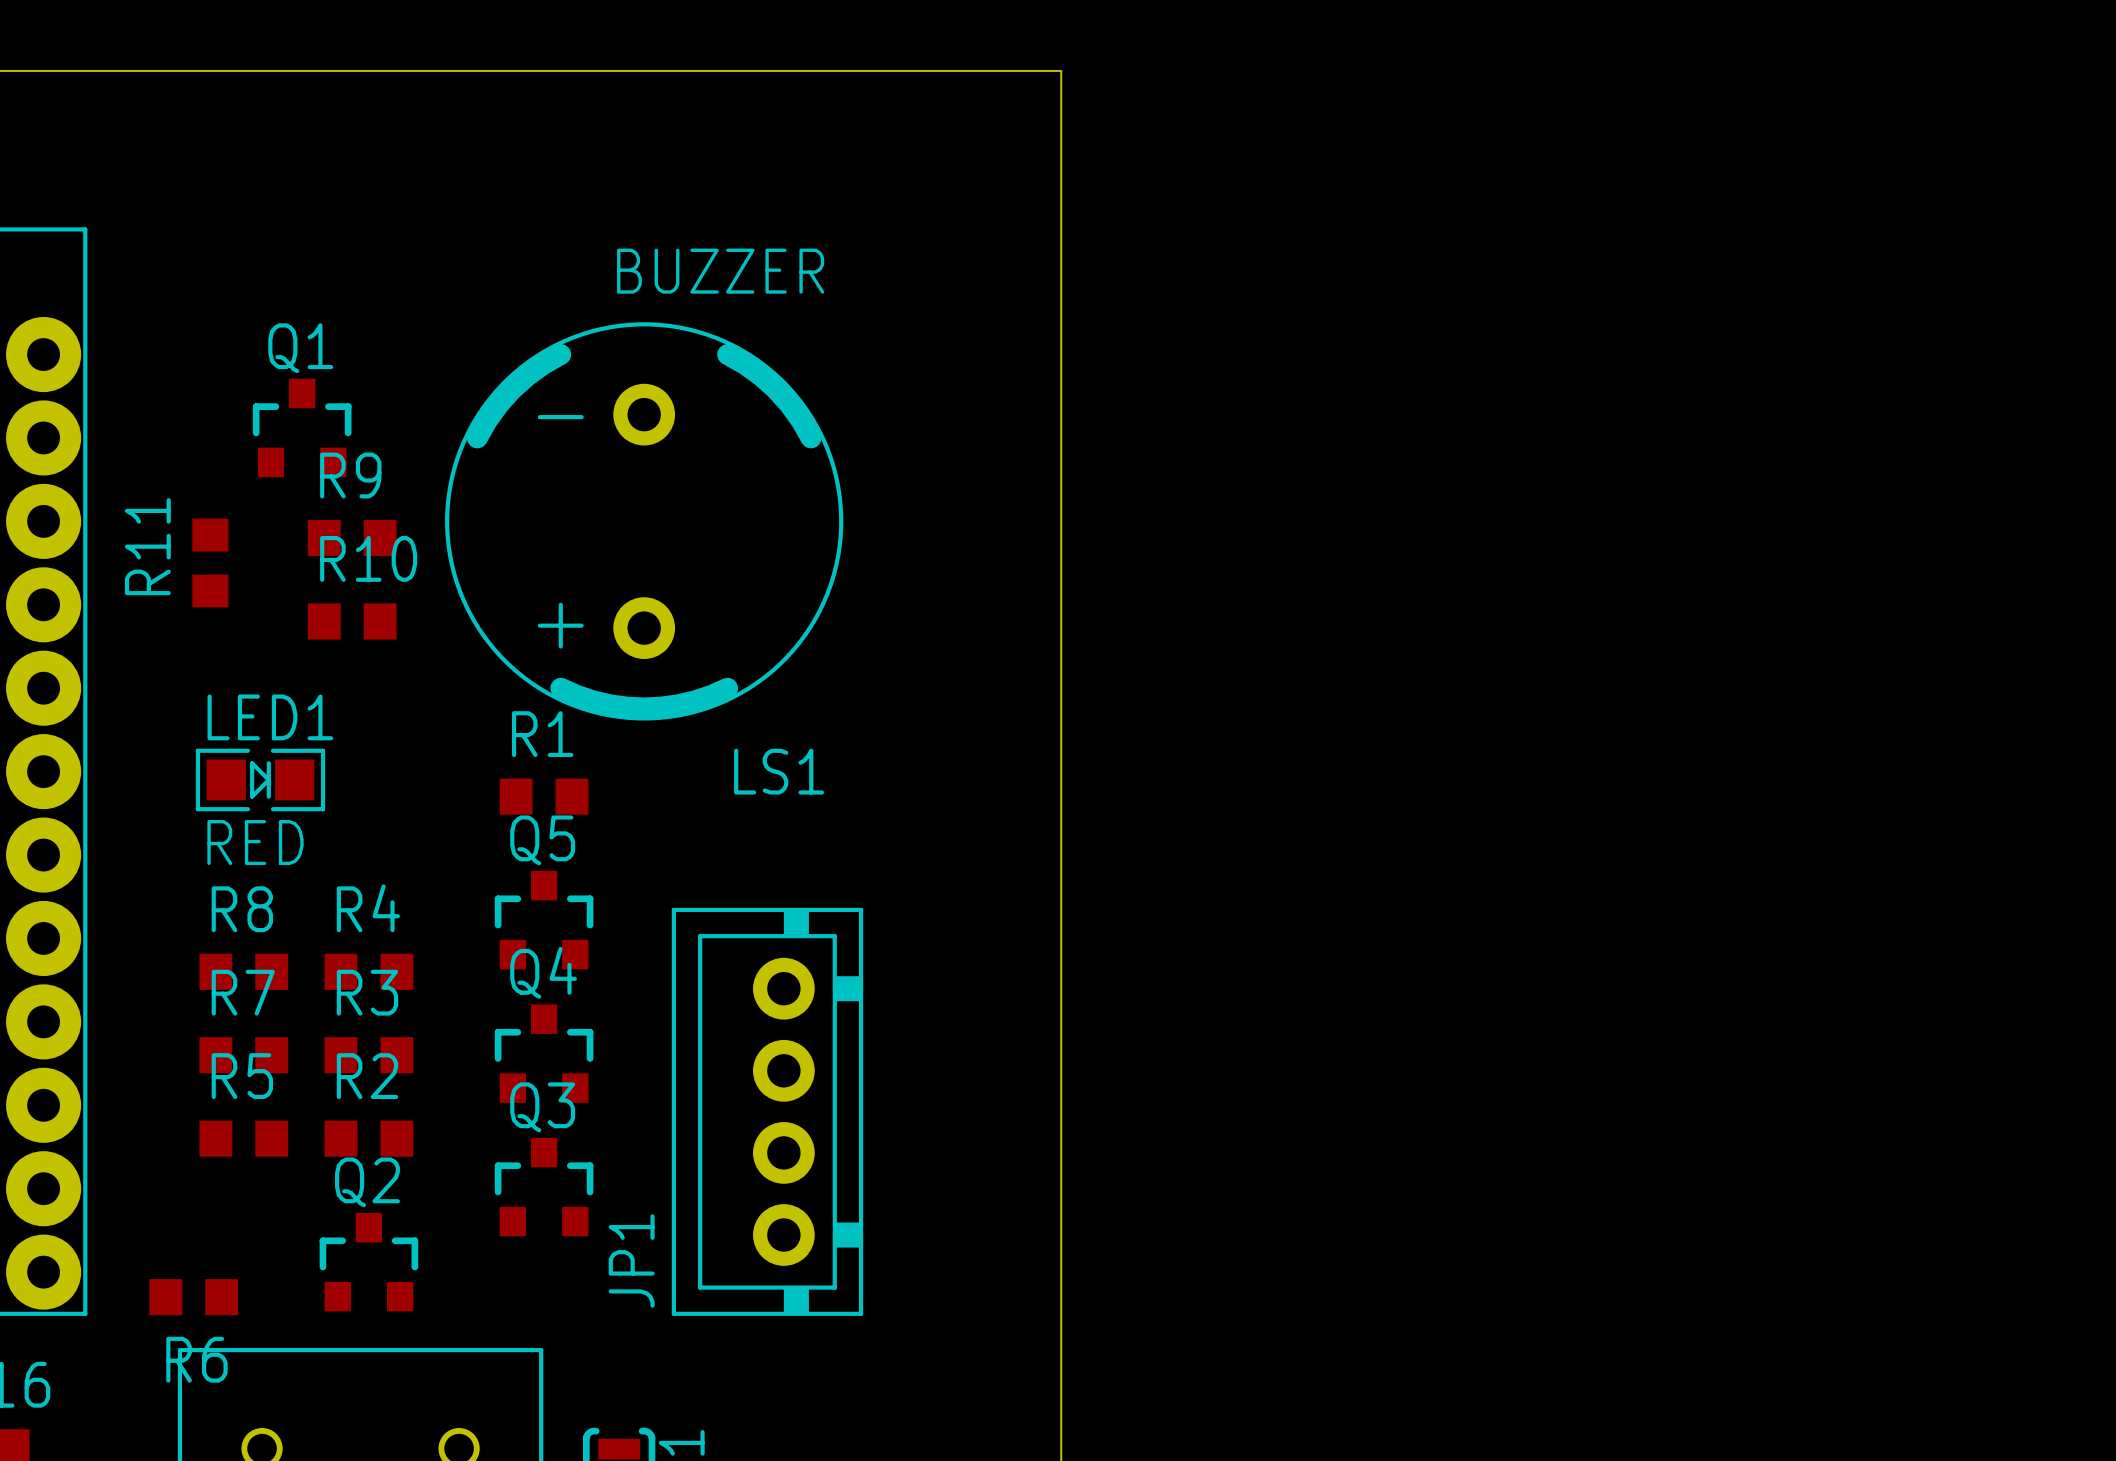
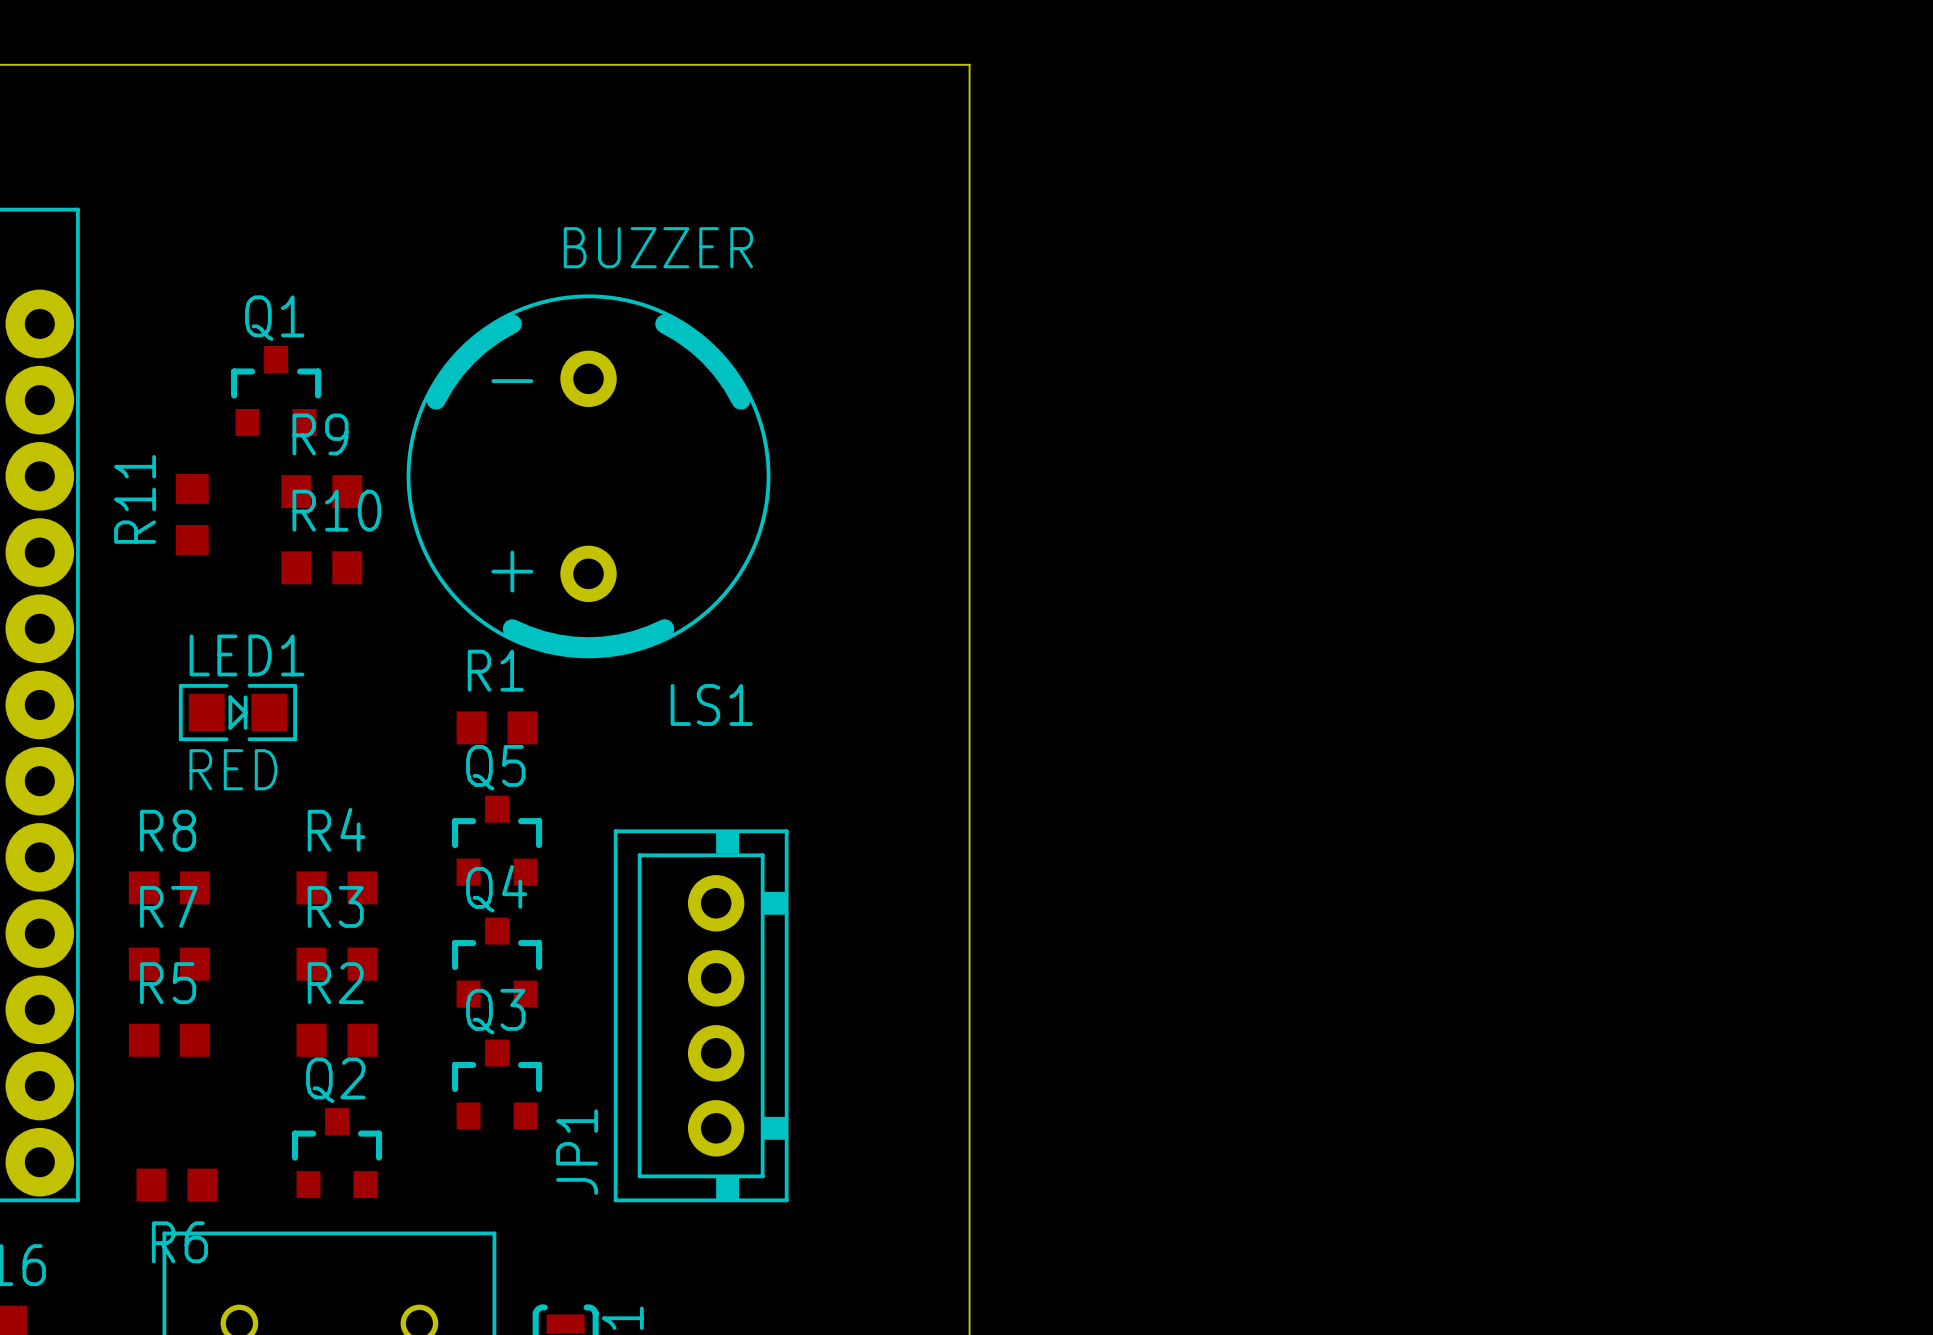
R8 position: (243, 971) -> (169, 887)
R7 position: (243, 1055) -> (169, 964)
R5 position: (243, 1138) -> (169, 1040)

